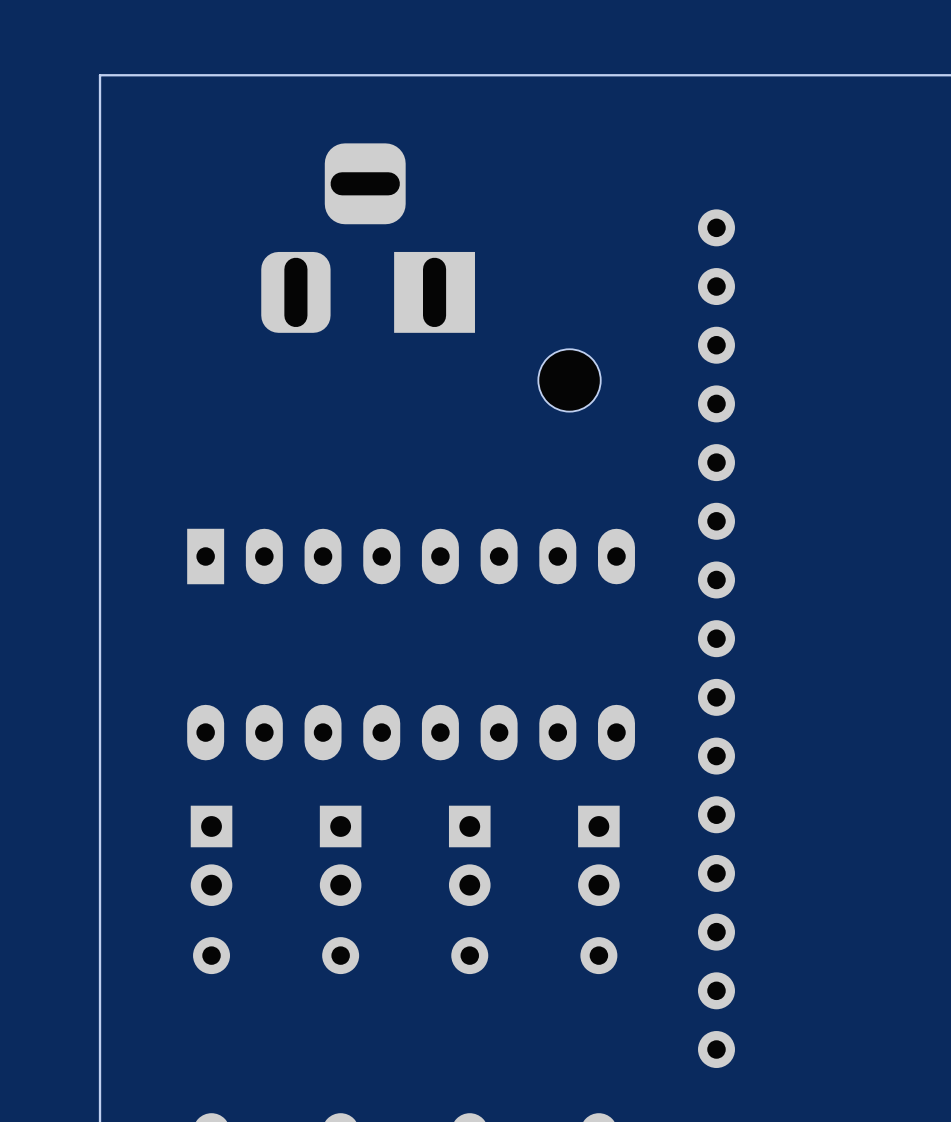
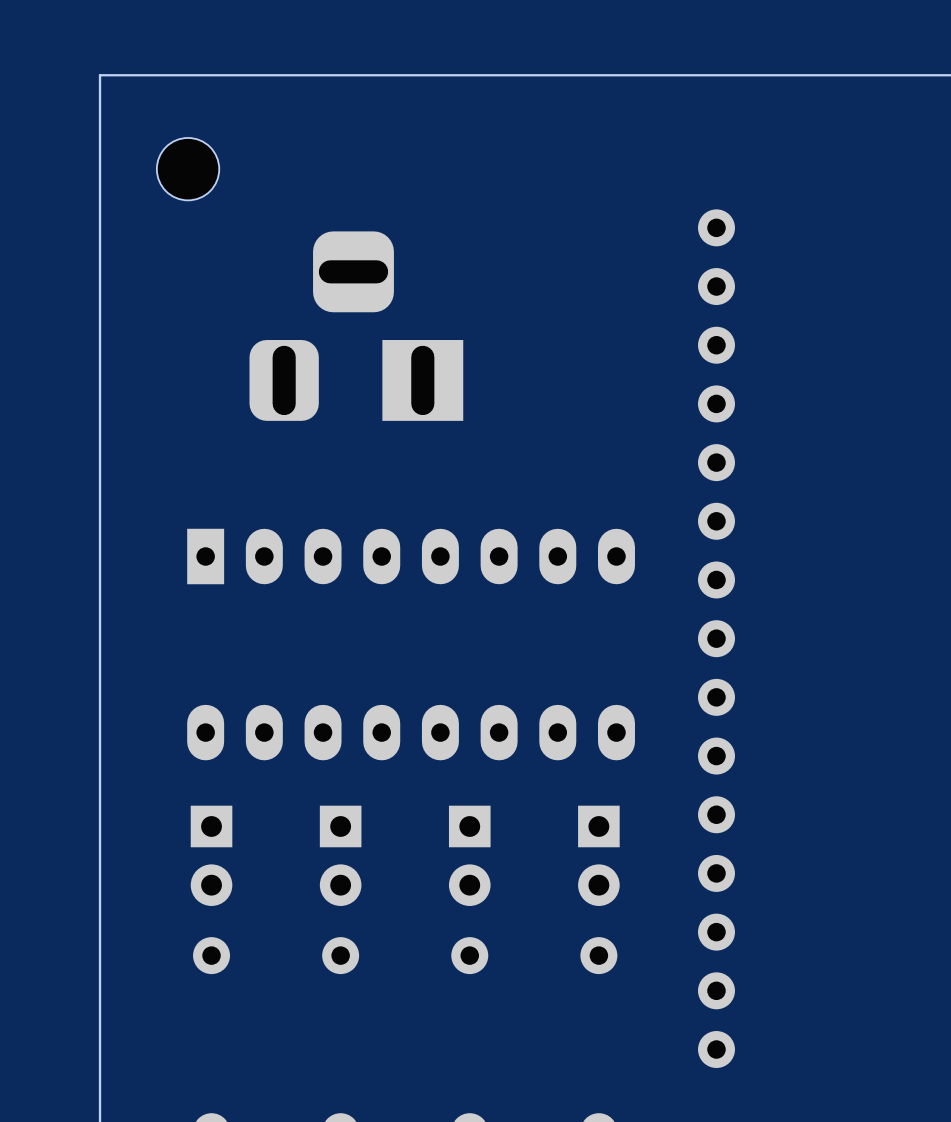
part position: (368, 238) -> (356, 326)
part position: (569, 380) -> (188, 169)

